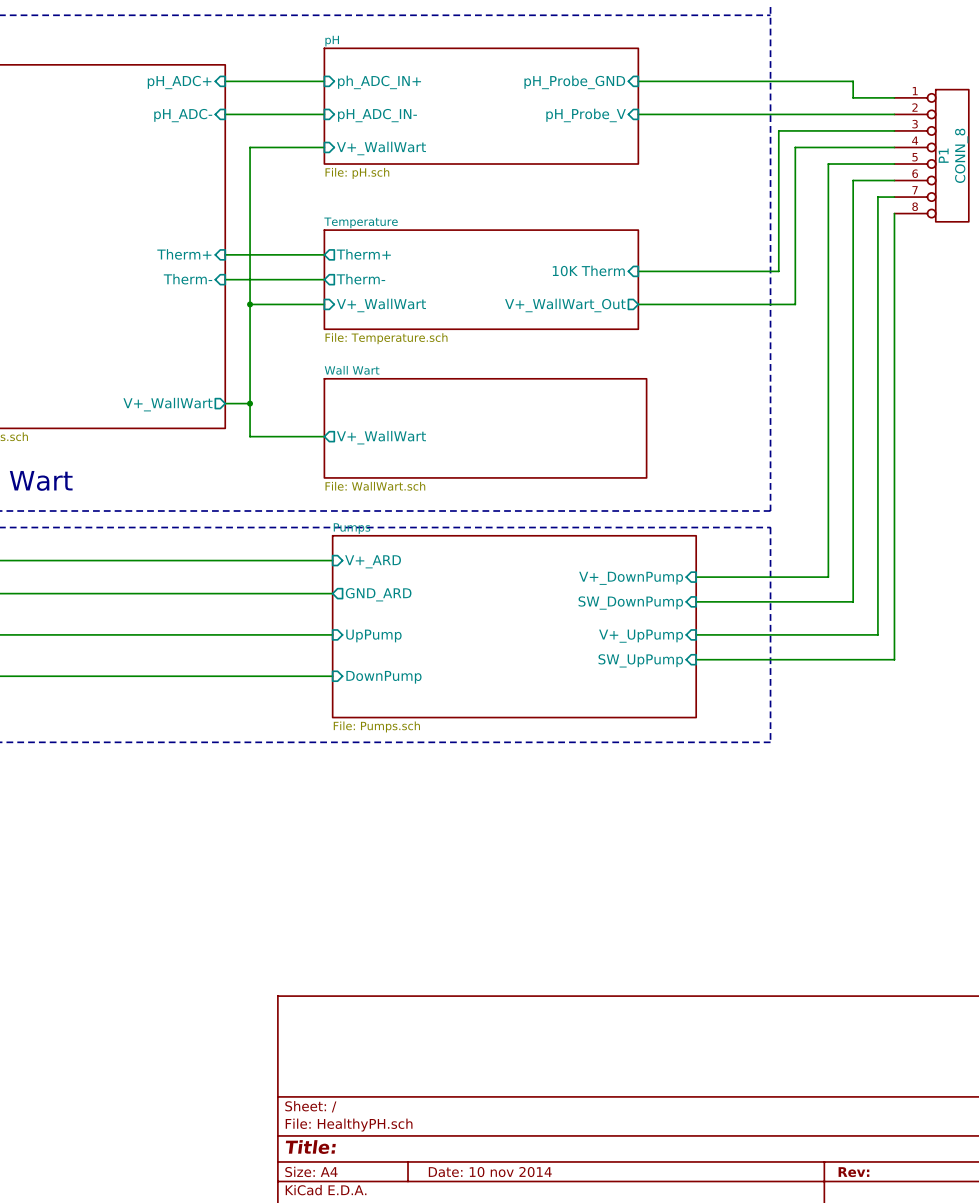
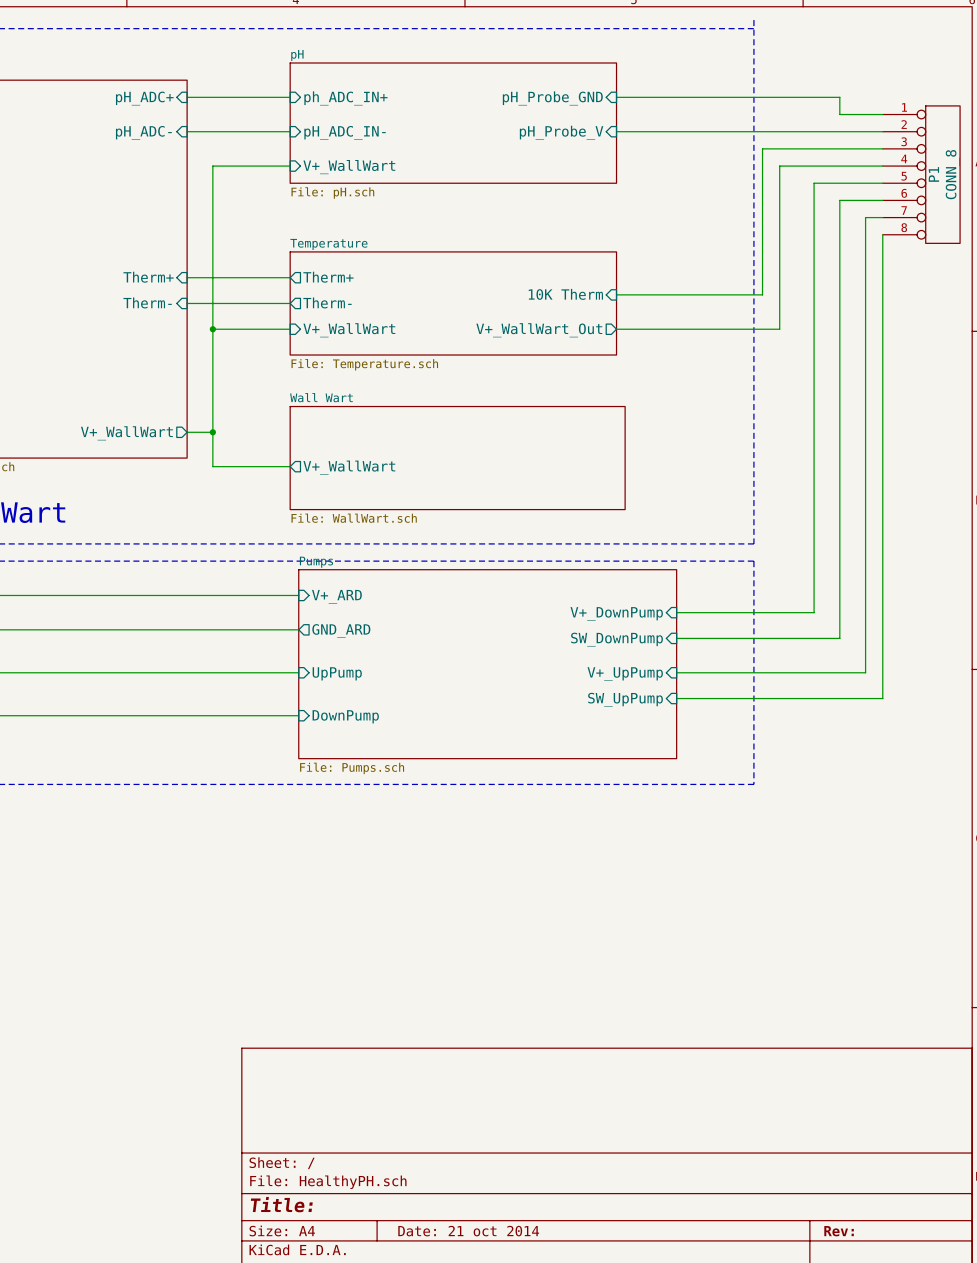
title block: Date: 10 nov 2014 (490, 1172) -> Date: 21 oct 2014 (468, 1231)

